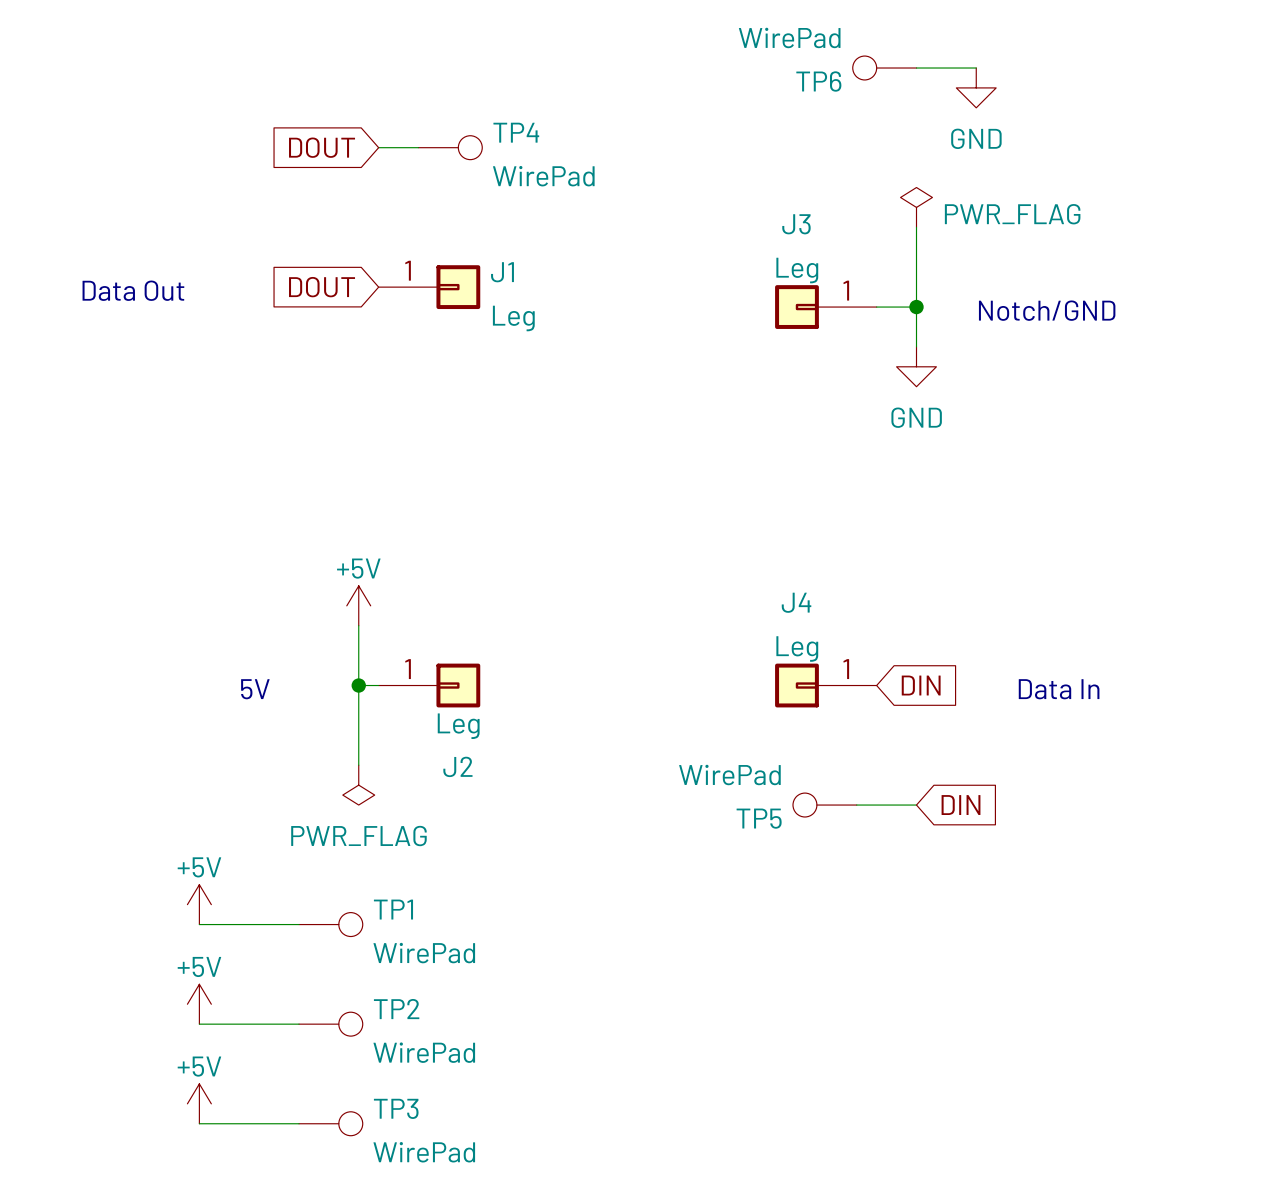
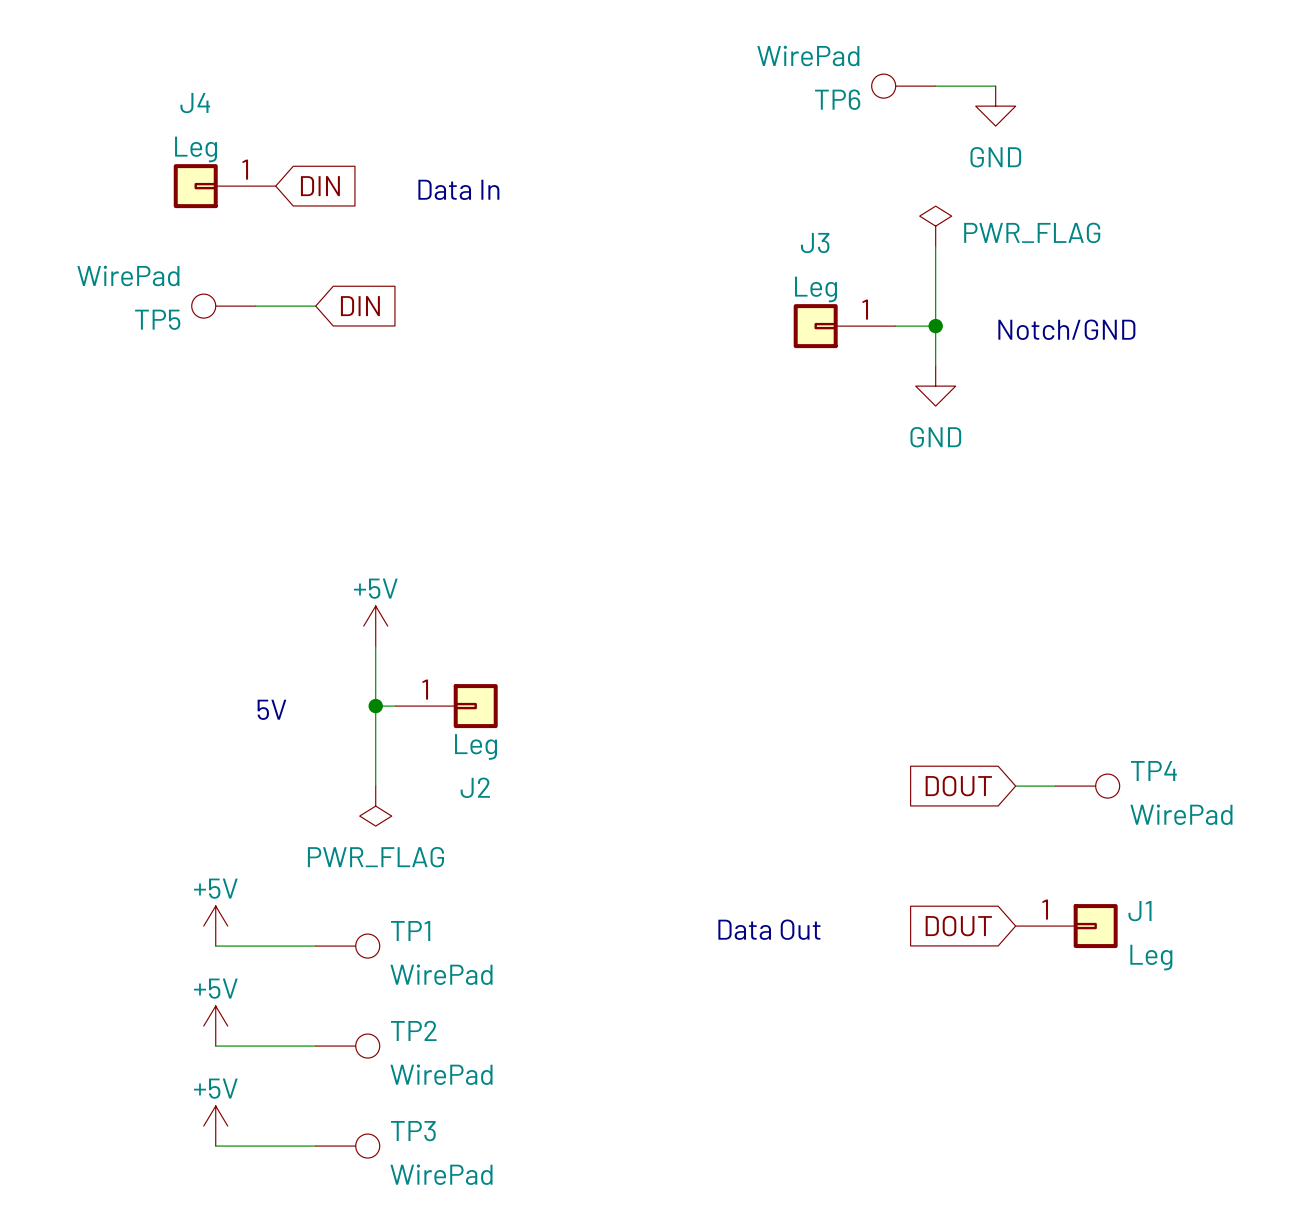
global label: DOUT (322, 147) -> none
wire: (378, 147) (418, 147) -> none
TP4 position: (450, 147) -> (1087, 786)
global label: none -> DIN (320, 186)
text: none -> Data In (458, 189)
wire: none -> (255, 306) (315, 306)
global label: DOUT (322, 287) -> none
global label: none -> DIN (360, 306)
J1 position: (429, 287) -> (1066, 926)
text: Data Out (133, 290) -> none
J4 position: (825, 685) -> (224, 186)
global label: DIN (921, 685) -> none
text: Data In (1059, 689) -> none
global label: none -> DOUT (958, 786)
wire: none -> (1015, 786) (1055, 786)
TP5 position: (824, 805) -> (223, 306)
wire: (856, 805) (916, 805) -> none
global label: DIN (961, 805) -> none
global label: none -> DOUT (958, 926)
text: none -> Data Out (769, 929)

